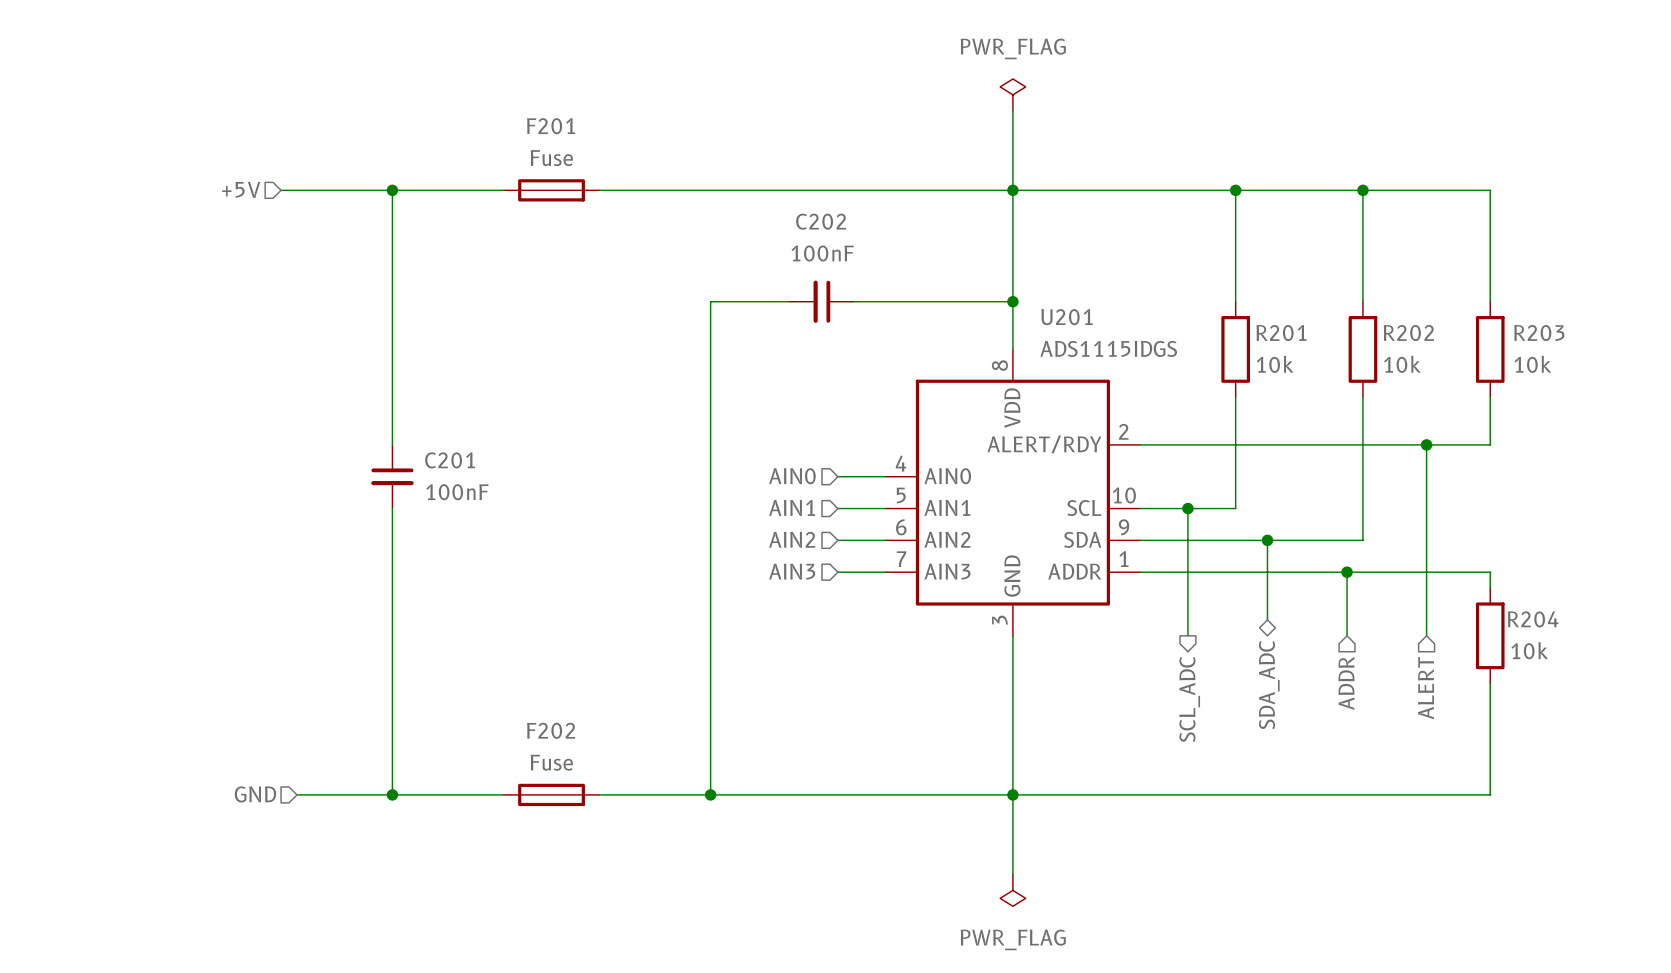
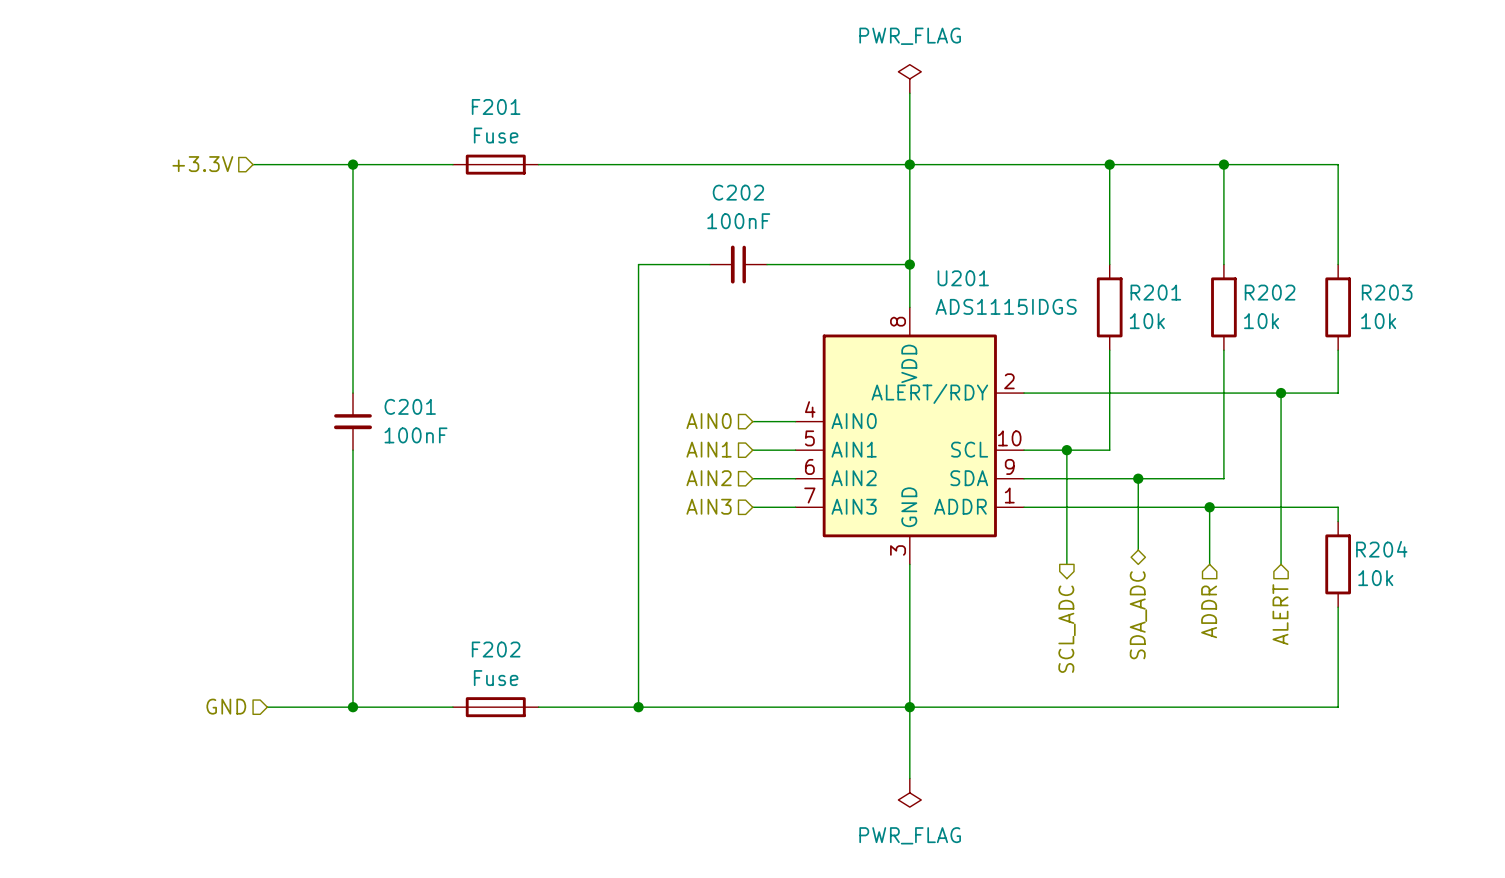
hierarchical label: +5V (241, 189) -> +3.3V (202, 164)

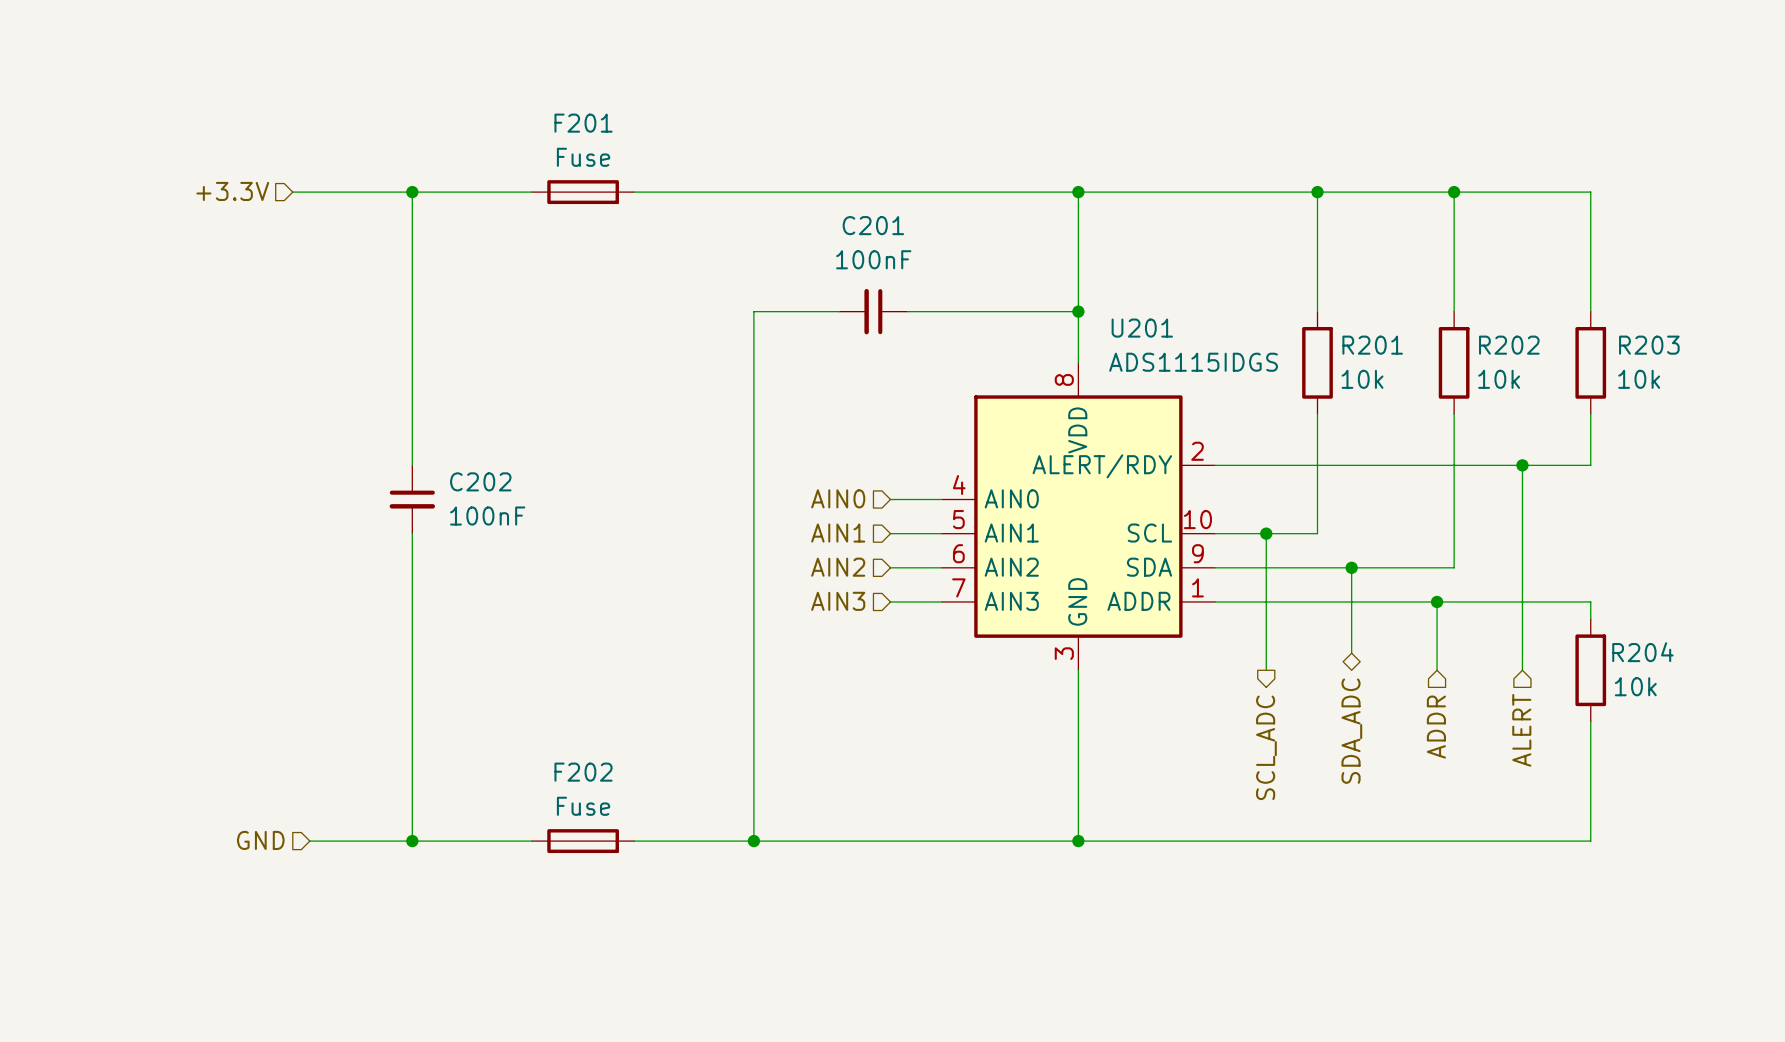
power symbol: PWR_FLAG (909, 78) -> none
wire: (909, 93) (909, 164) -> none
C202 name: C202 (738, 192) -> C201 (873, 225)
C201 name: C201 (410, 406) -> C202 (480, 481)
wire: (909, 707) (909, 778) -> none
power symbol: PWR_FLAG (909, 792) -> none

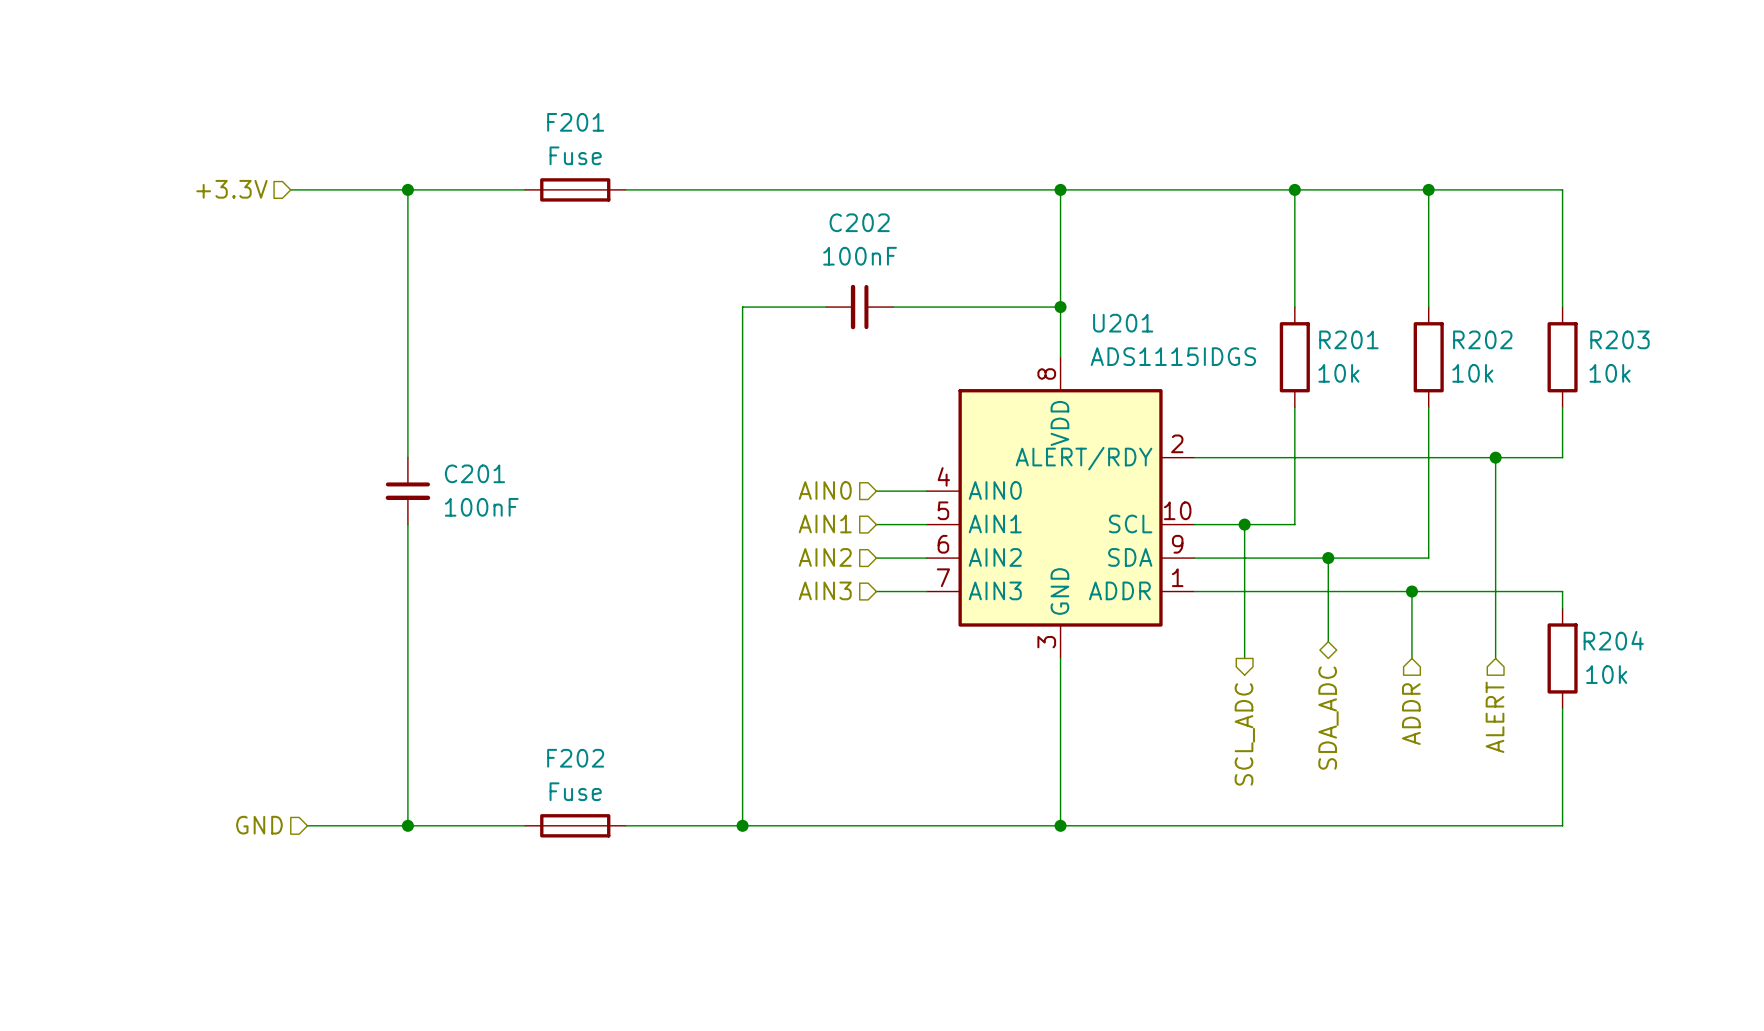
C201 name: C201 (873, 225) -> C202 (859, 222)
C202 name: C202 (480, 481) -> C201 (474, 473)

